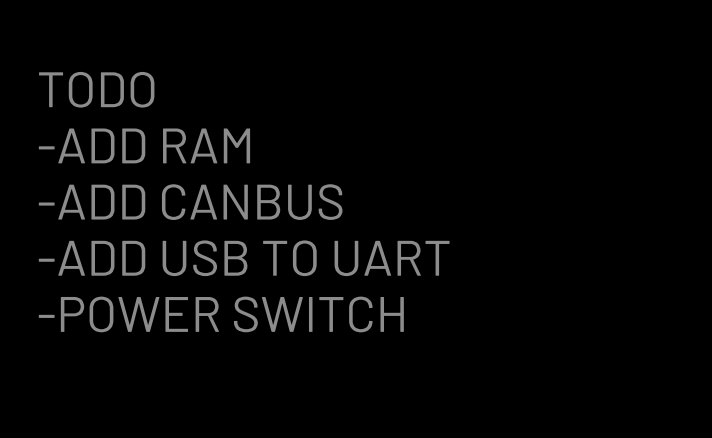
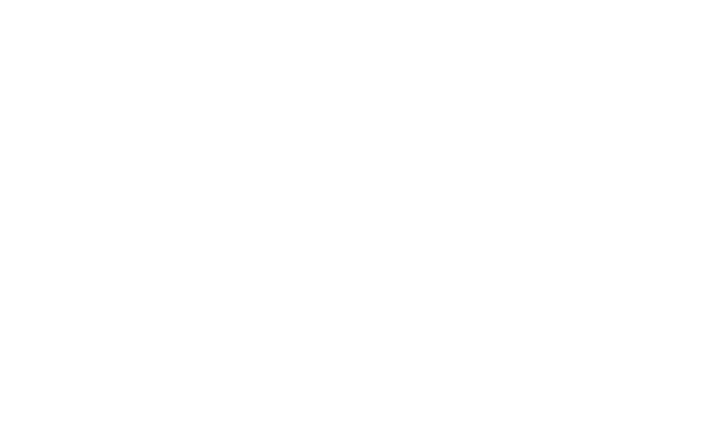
text: TODO (96, 89) -> none
text: -ADD RAM (144, 145) -> none
text: -ADD CANBUS (190, 202) -> none
text: -ADD USB TO UART (244, 258) -> none
text: -POWER SWITCH (221, 314) -> none

